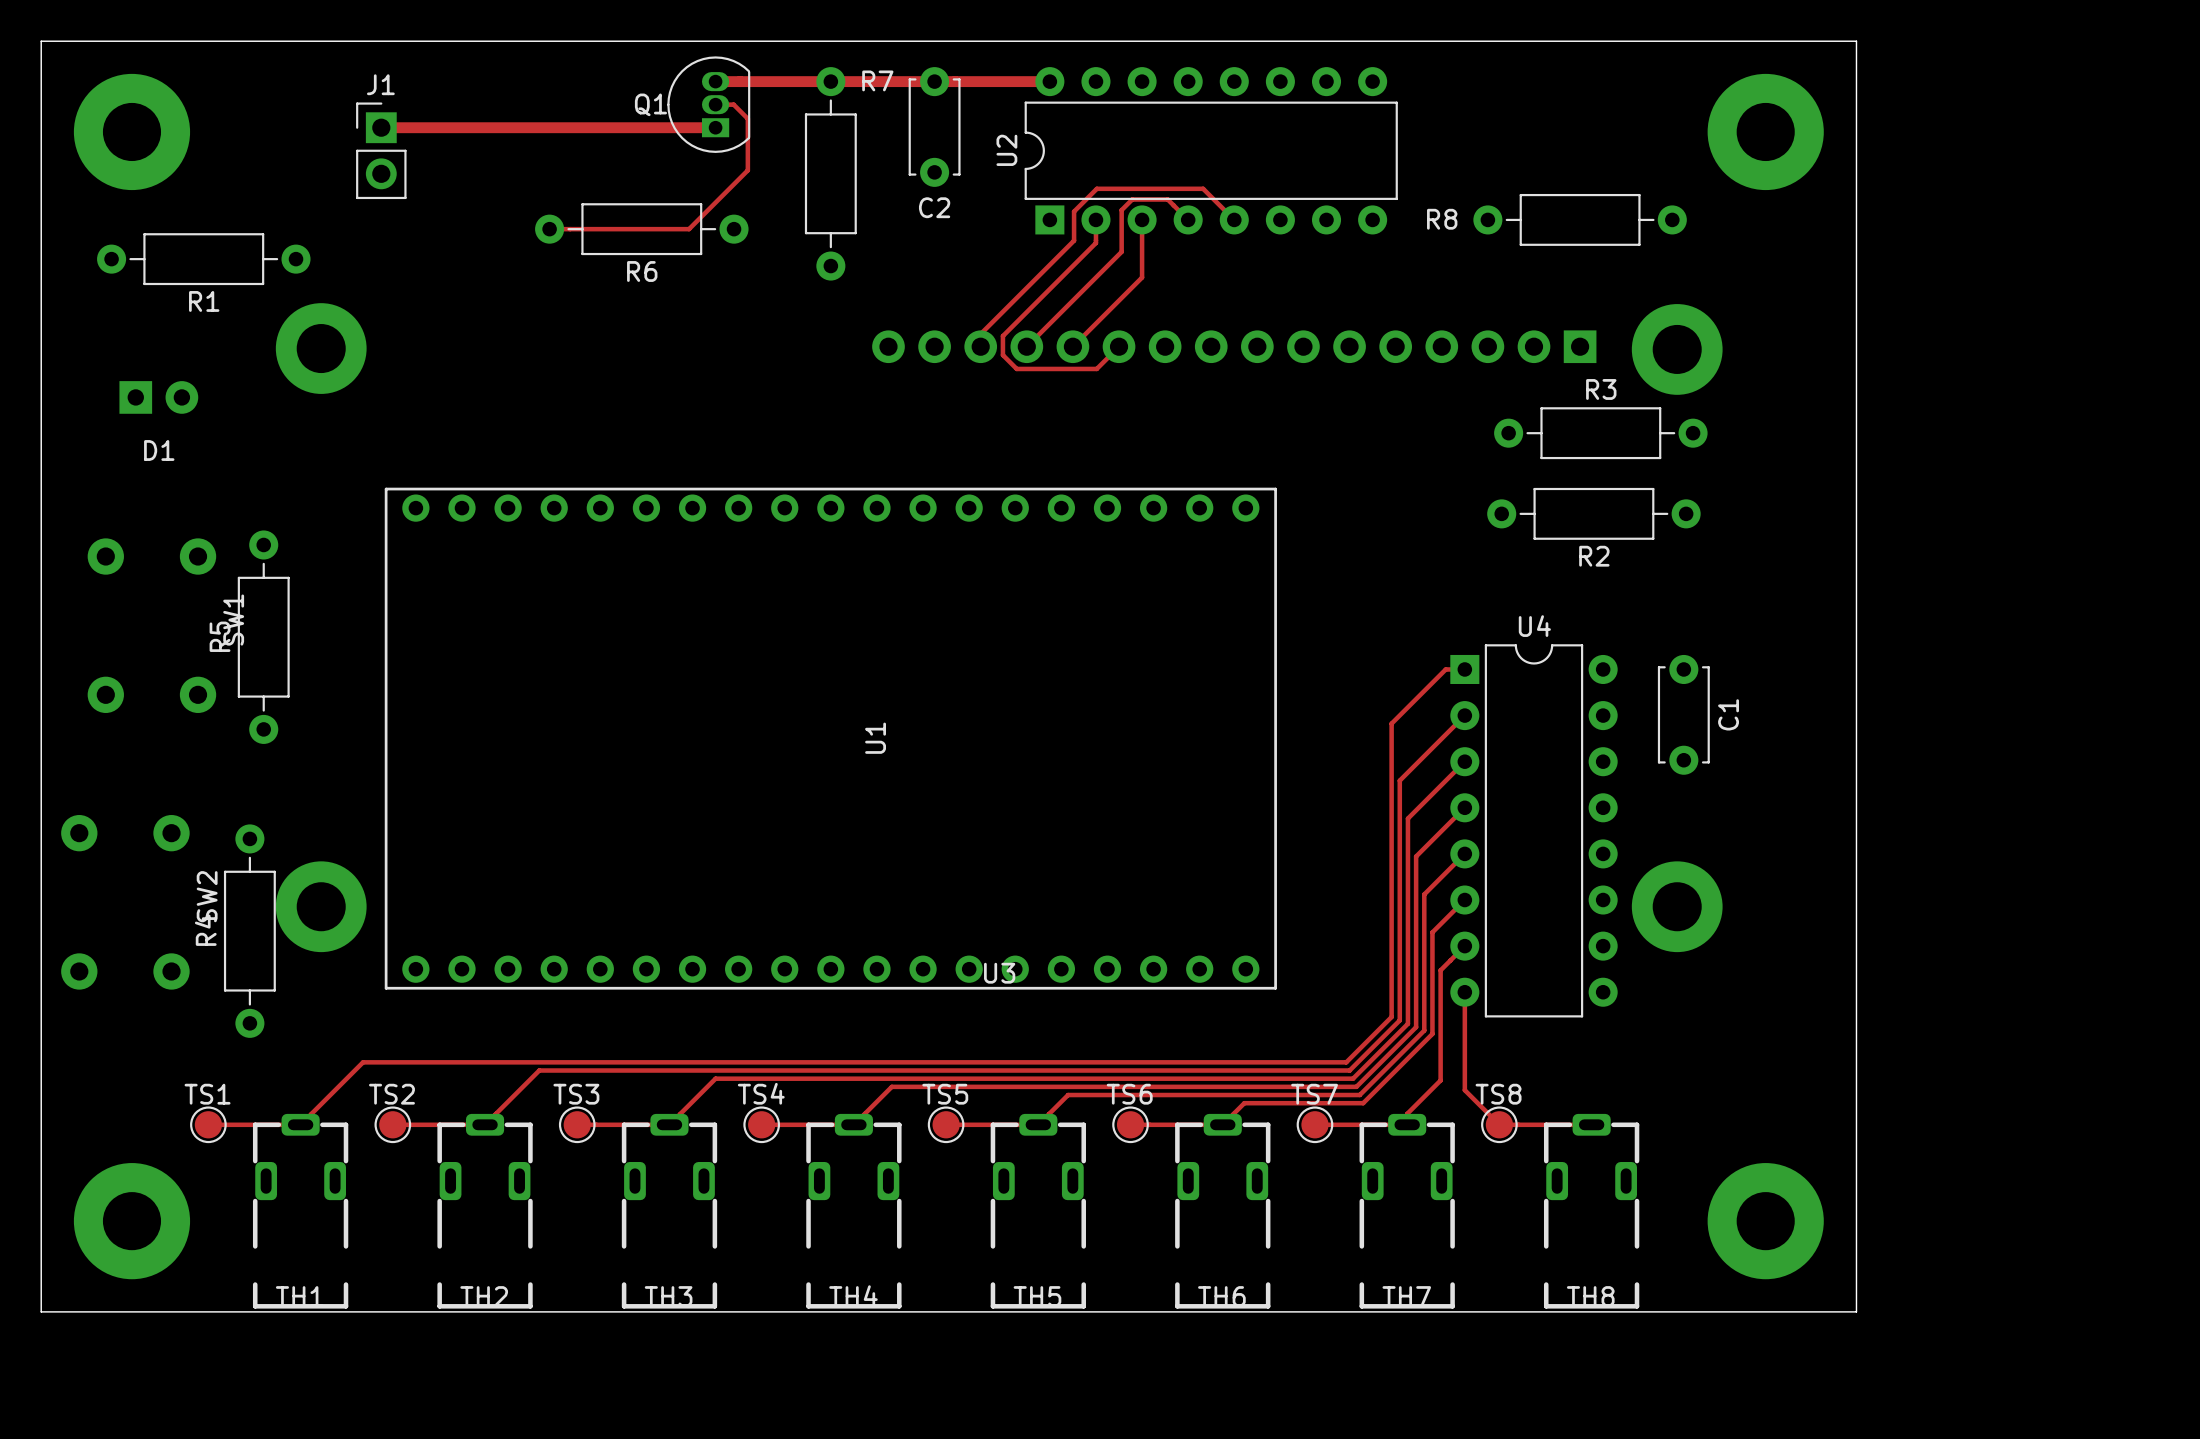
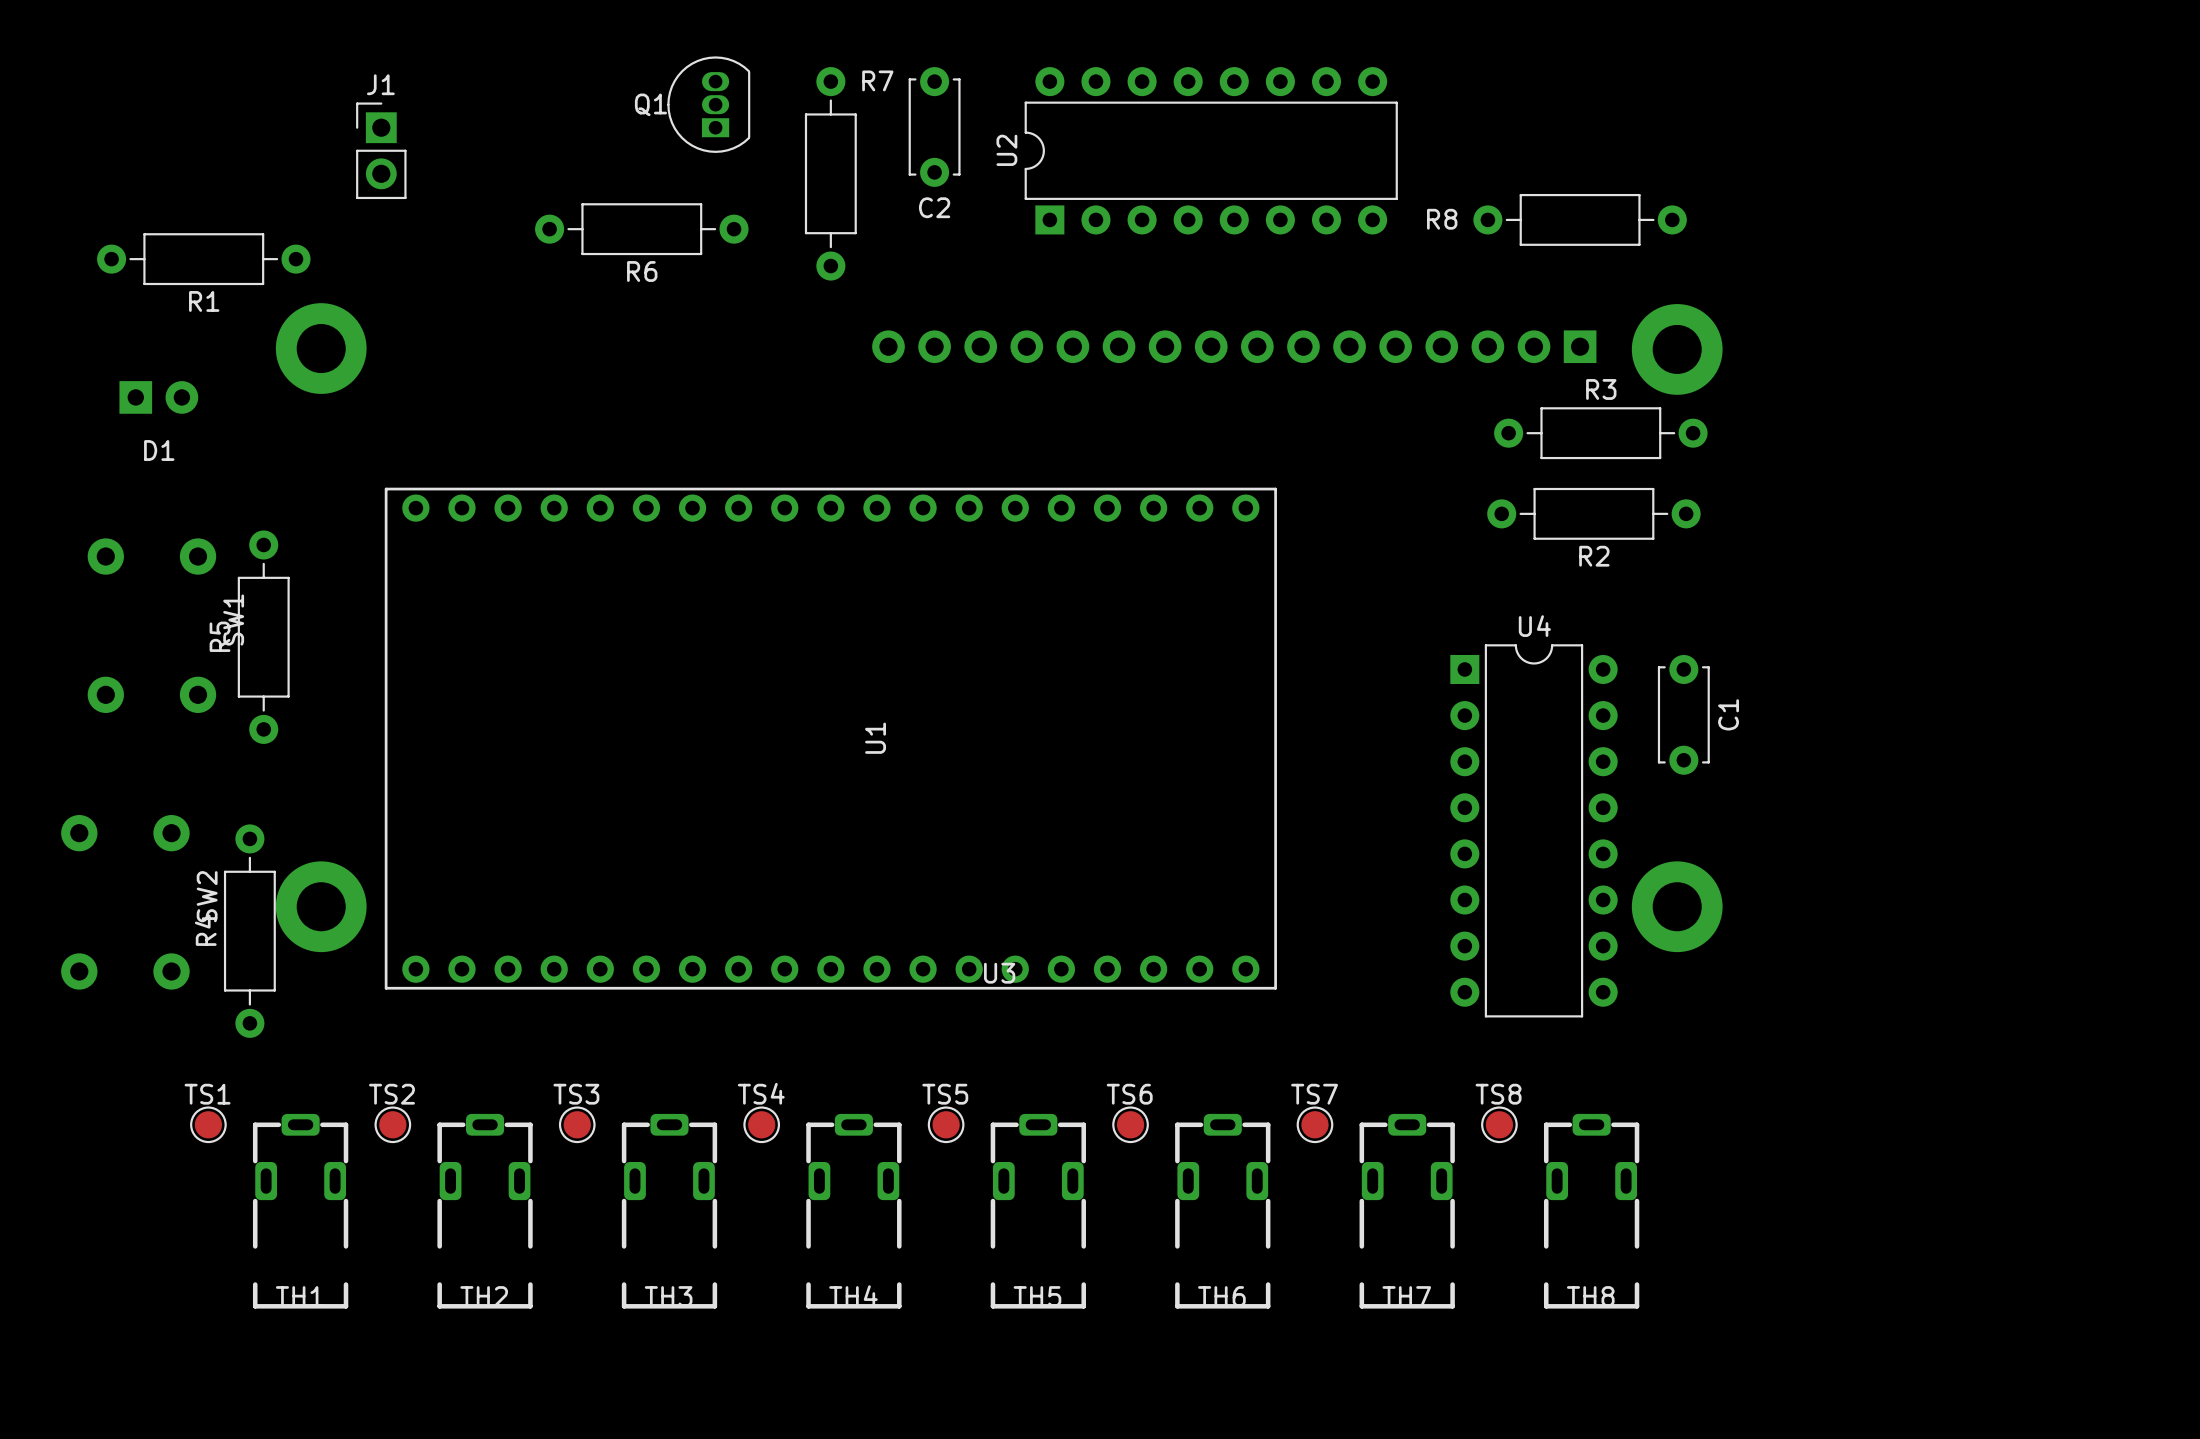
board edge: (41, 41) (41, 1311) (1856, 1311) (1856, 41) (41, 41) -> none
top track: (715, 81) (1049, 81) -> none
top track: (715, 104) (733, 104) (747, 118) (747, 170) (689, 229) (549, 229) -> none
top track: (381, 127) (715, 127) -> none
part: (131, 131) -> none
part: (1765, 131) -> none
top track: (1095, 219) (1095, 243) (1002, 336) (1002, 355) (1016, 368) (1096, 368) (1119, 346) -> none
top track: (1142, 219) (1142, 277) (1072, 346) -> none
top track: (1188, 219) (1167, 199) (1132, 199) (1121, 210) (1121, 251) (1026, 346) -> none
top track: (1234, 219) (1203, 188) (1096, 188) (1074, 211) (1074, 240) (980, 334) (980, 346) -> none
top track: (1464, 669) (1445, 669) (1391, 723) (1391, 1017) (1346, 1062) (363, 1062) (300, 1124) (208, 1124) -> none
top track: (1464, 715) (1399, 780) (1399, 1020) (1349, 1070) (539, 1070) (485, 1124) (392, 1124) -> none
top track: (1464, 761) (1407, 818) (1407, 1023) (1353, 1078) (715, 1078) (669, 1124) (577, 1124) -> none
top track: (1464, 807) (1416, 856) (1416, 1027) (1356, 1086) (891, 1086) (853, 1124) (761, 1124) -> none
top track: (1464, 853) (1424, 894) (1424, 1030) (1359, 1095) (1068, 1095) (1038, 1124) (946, 1124) -> none
top track: (1464, 900) (1432, 932) (1432, 1033) (1363, 1103) (1244, 1103) (1222, 1124) (1130, 1124) -> none
top track: (1464, 946) (1440, 970) (1440, 1080) (1407, 1113) (1407, 1124) (1314, 1124) -> none
top track: (1464, 992) (1464, 1090) (1499, 1124) (1591, 1124) -> none
part: (131, 1221) -> none
part: (1765, 1221) -> none

